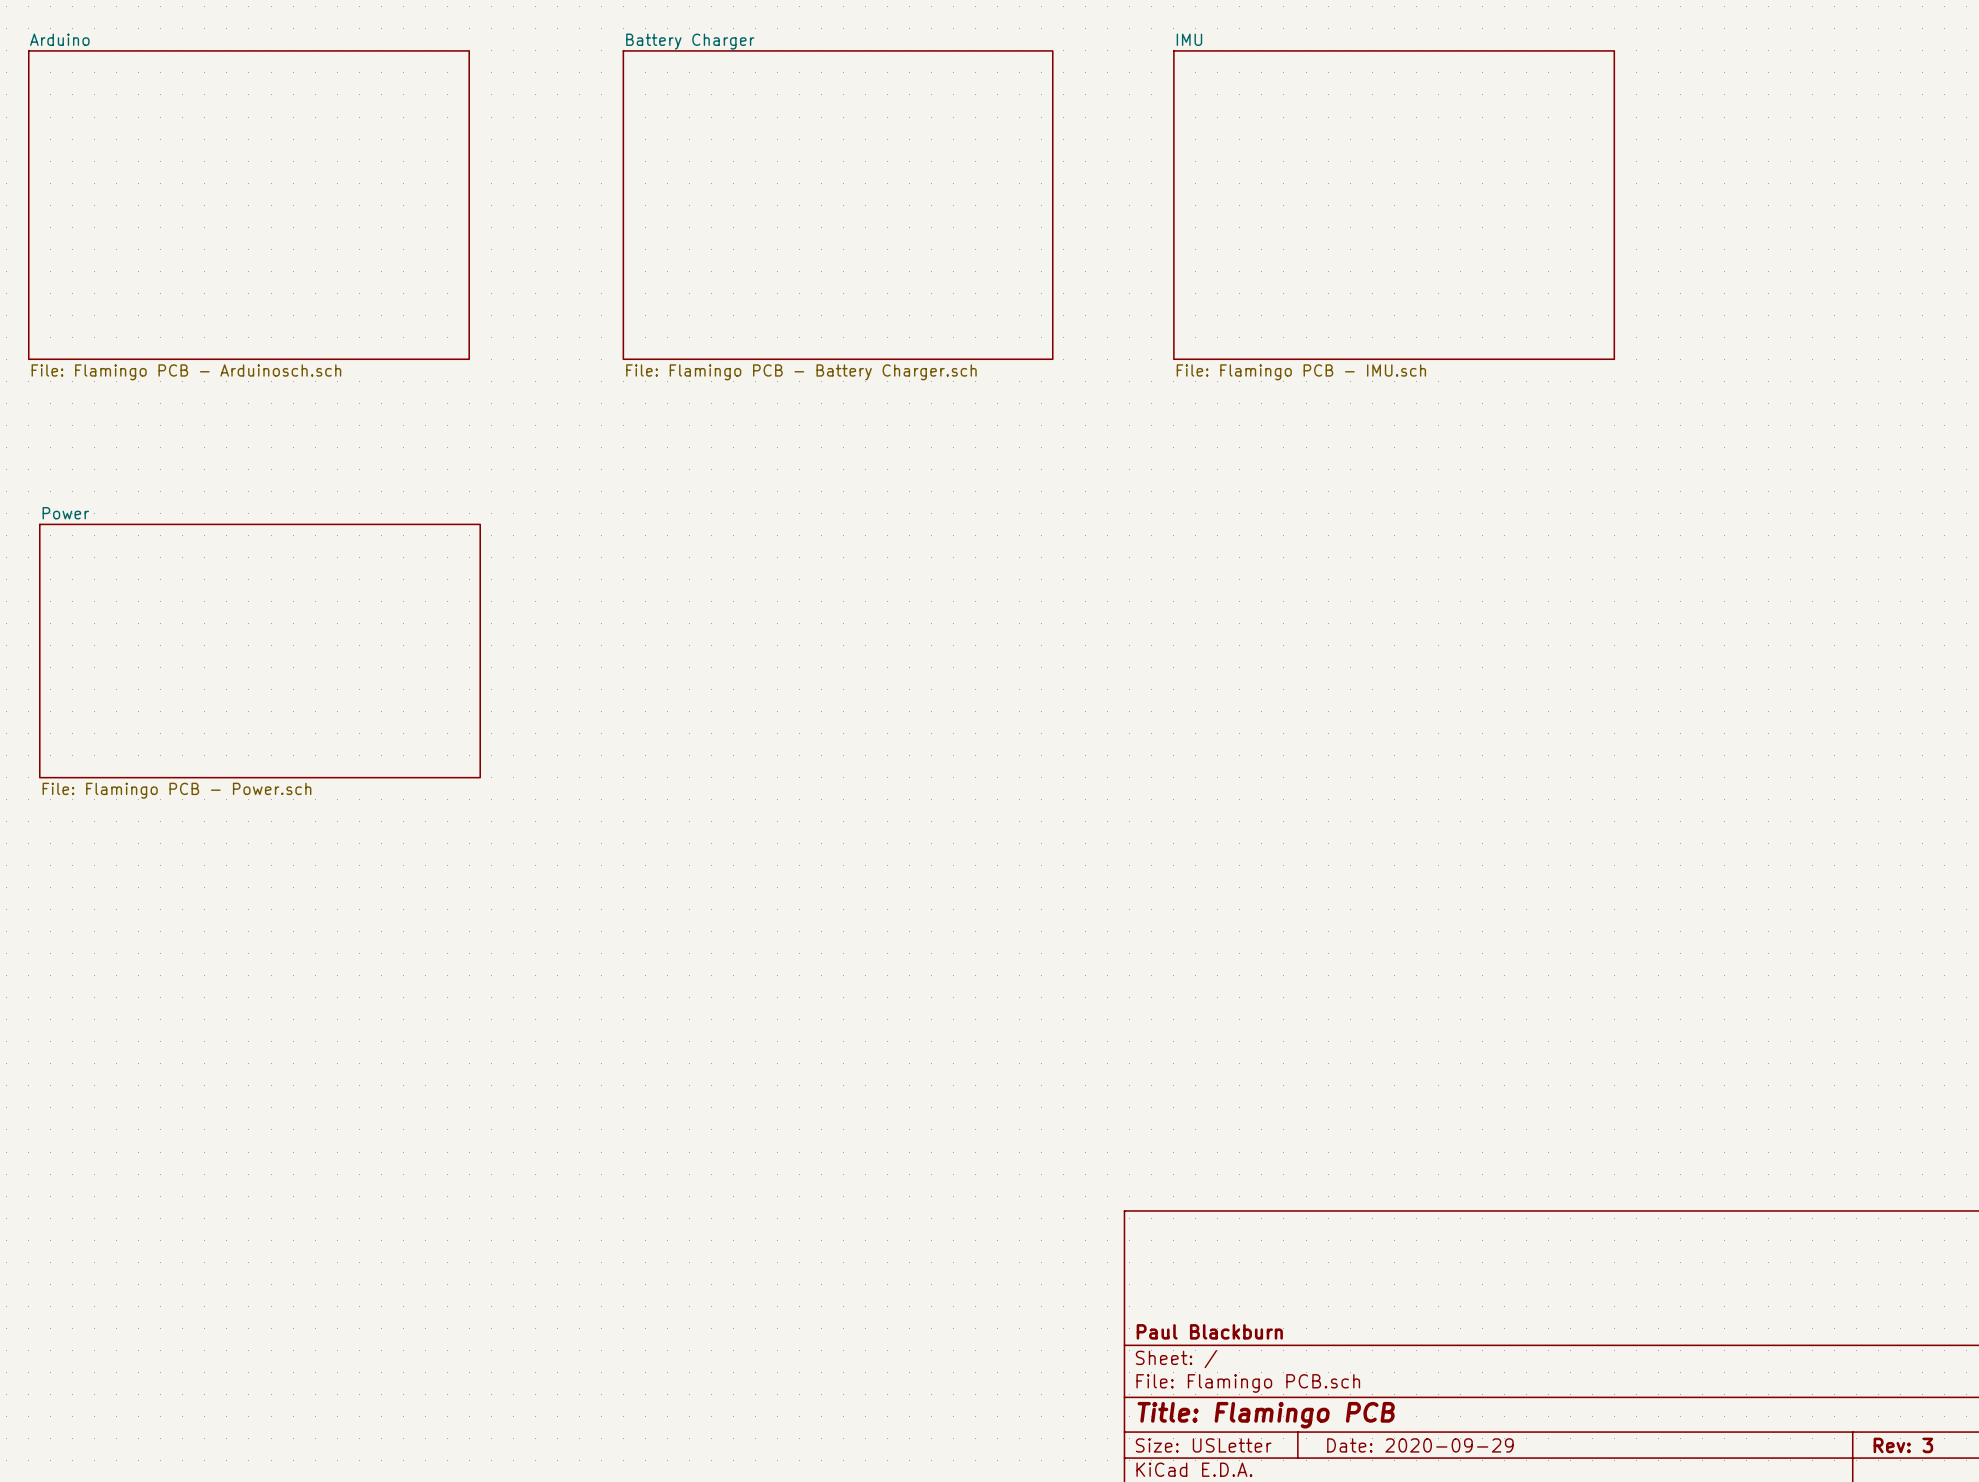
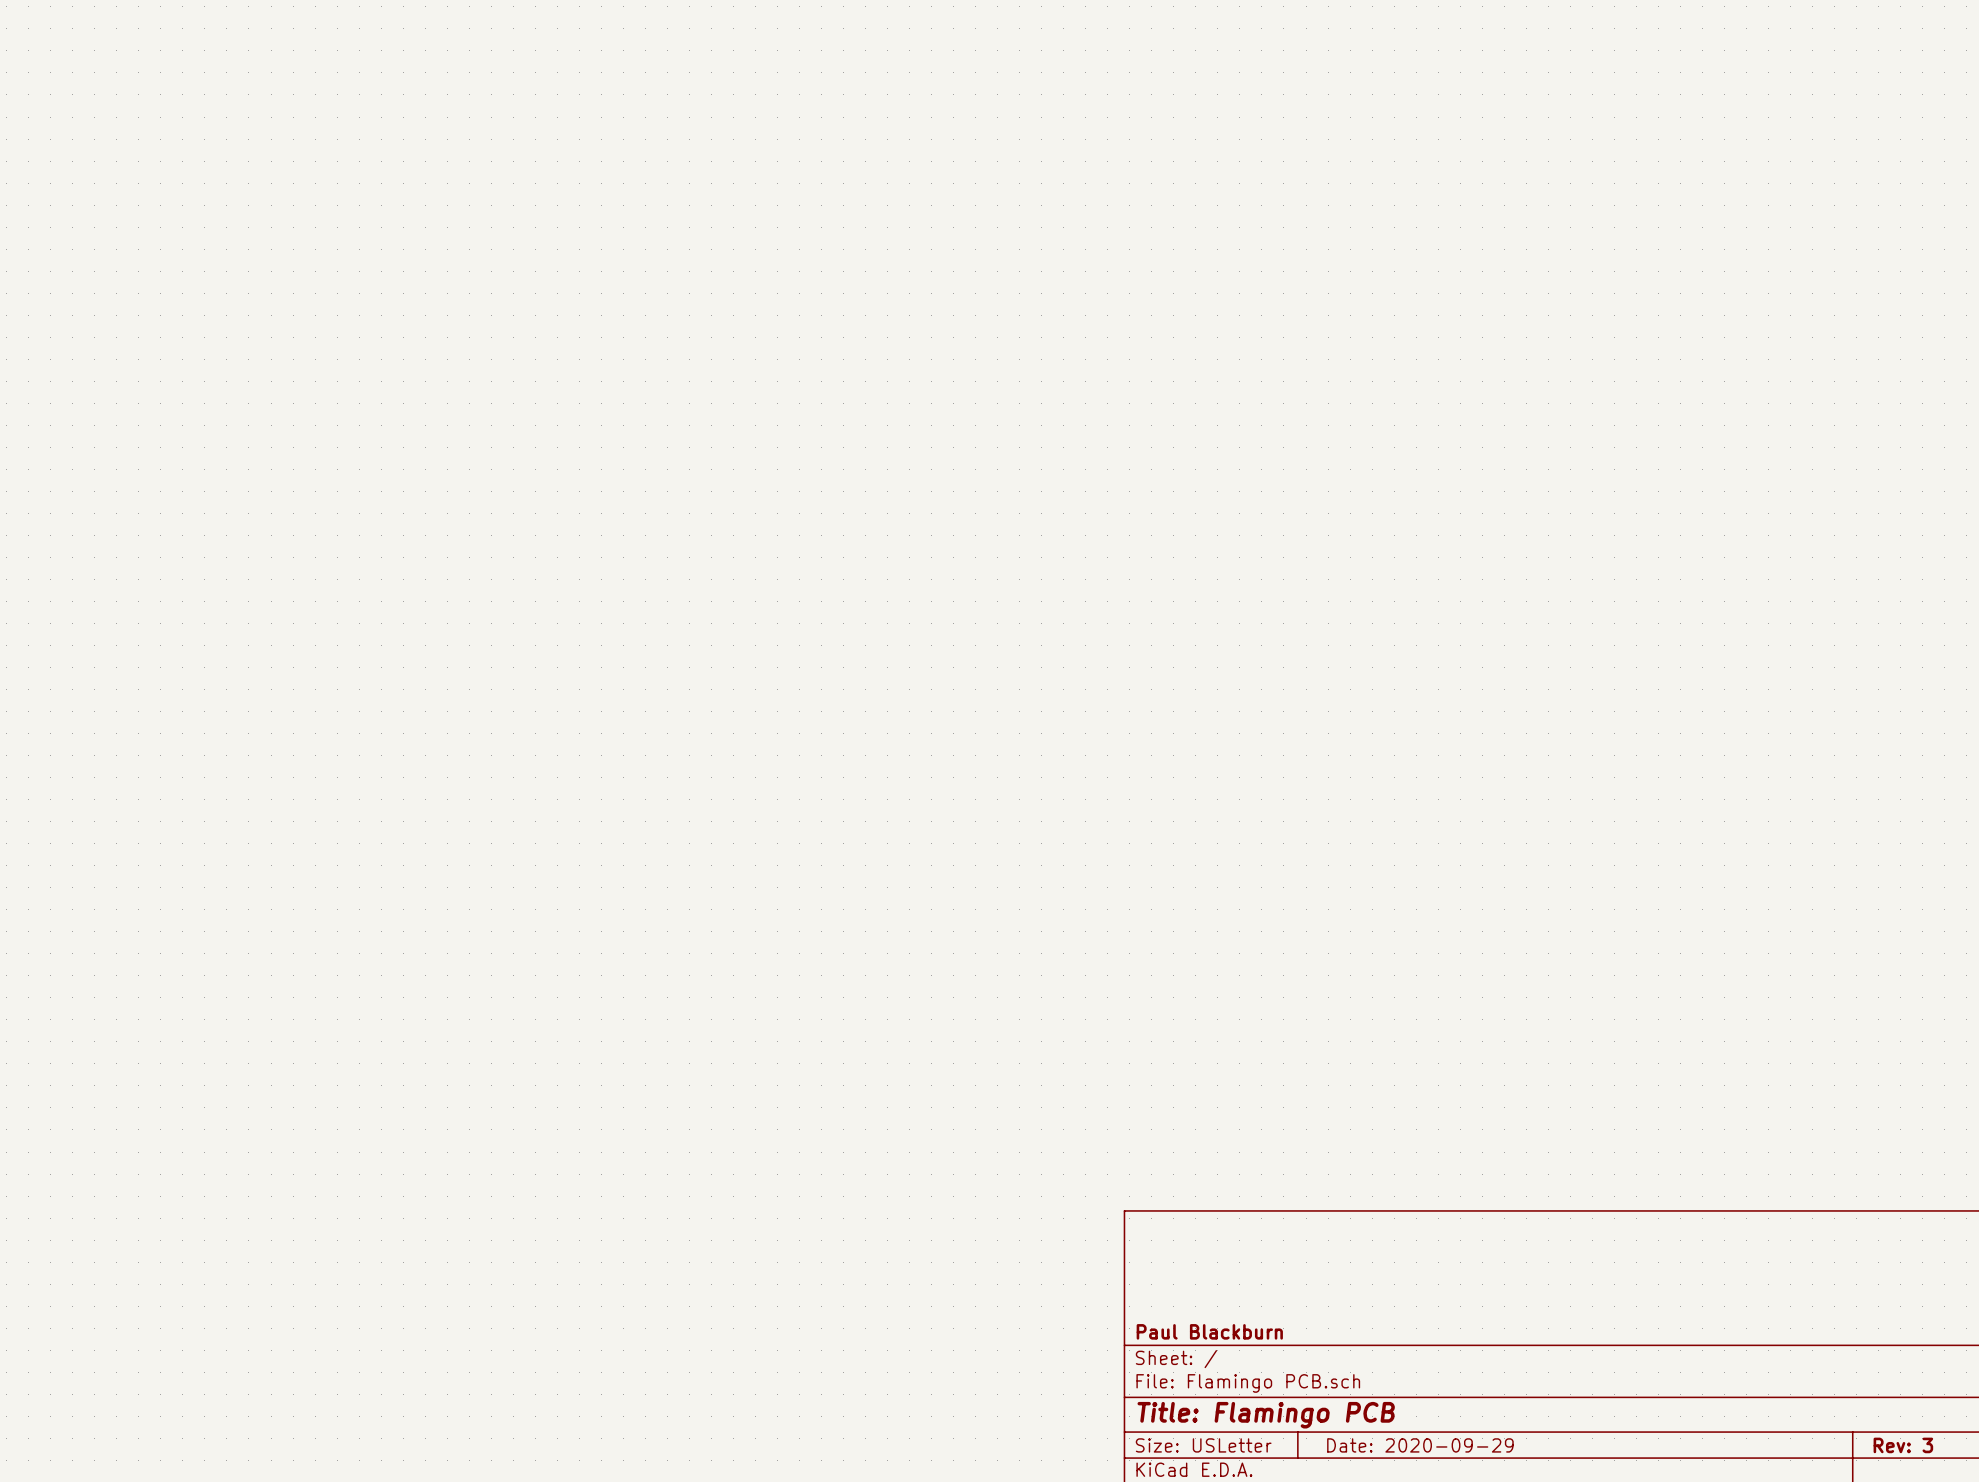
sheet Arduino: File: Flamingo PCB - Arduinosch.sch (248, 205) -> none
sheet Battery Charger: File: Flamingo PCB - Battery Charger.sch (838, 205) -> none
sheet IMU: File: Flamingo PCB - IMU.sch (1394, 205) -> none
sheet Power: File: Flamingo PCB - Power.sch (259, 651) -> none

